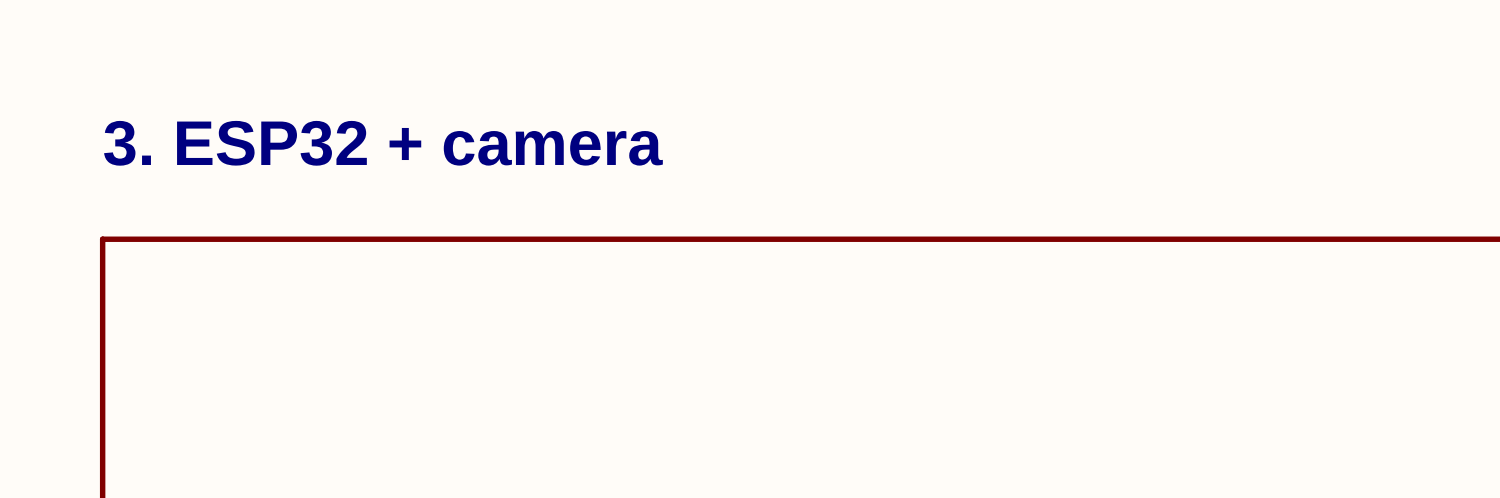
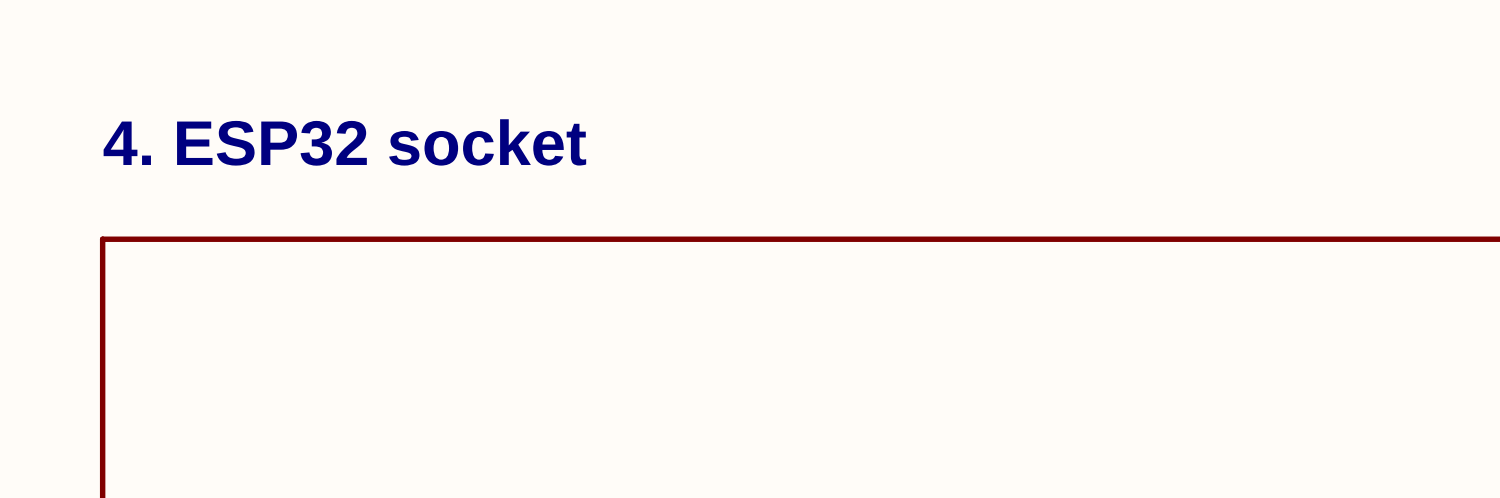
sheet 3. ESP32 + camera name: 3. ESP32 + camera (383, 143) -> 4. ESP32 socket (344, 142)

